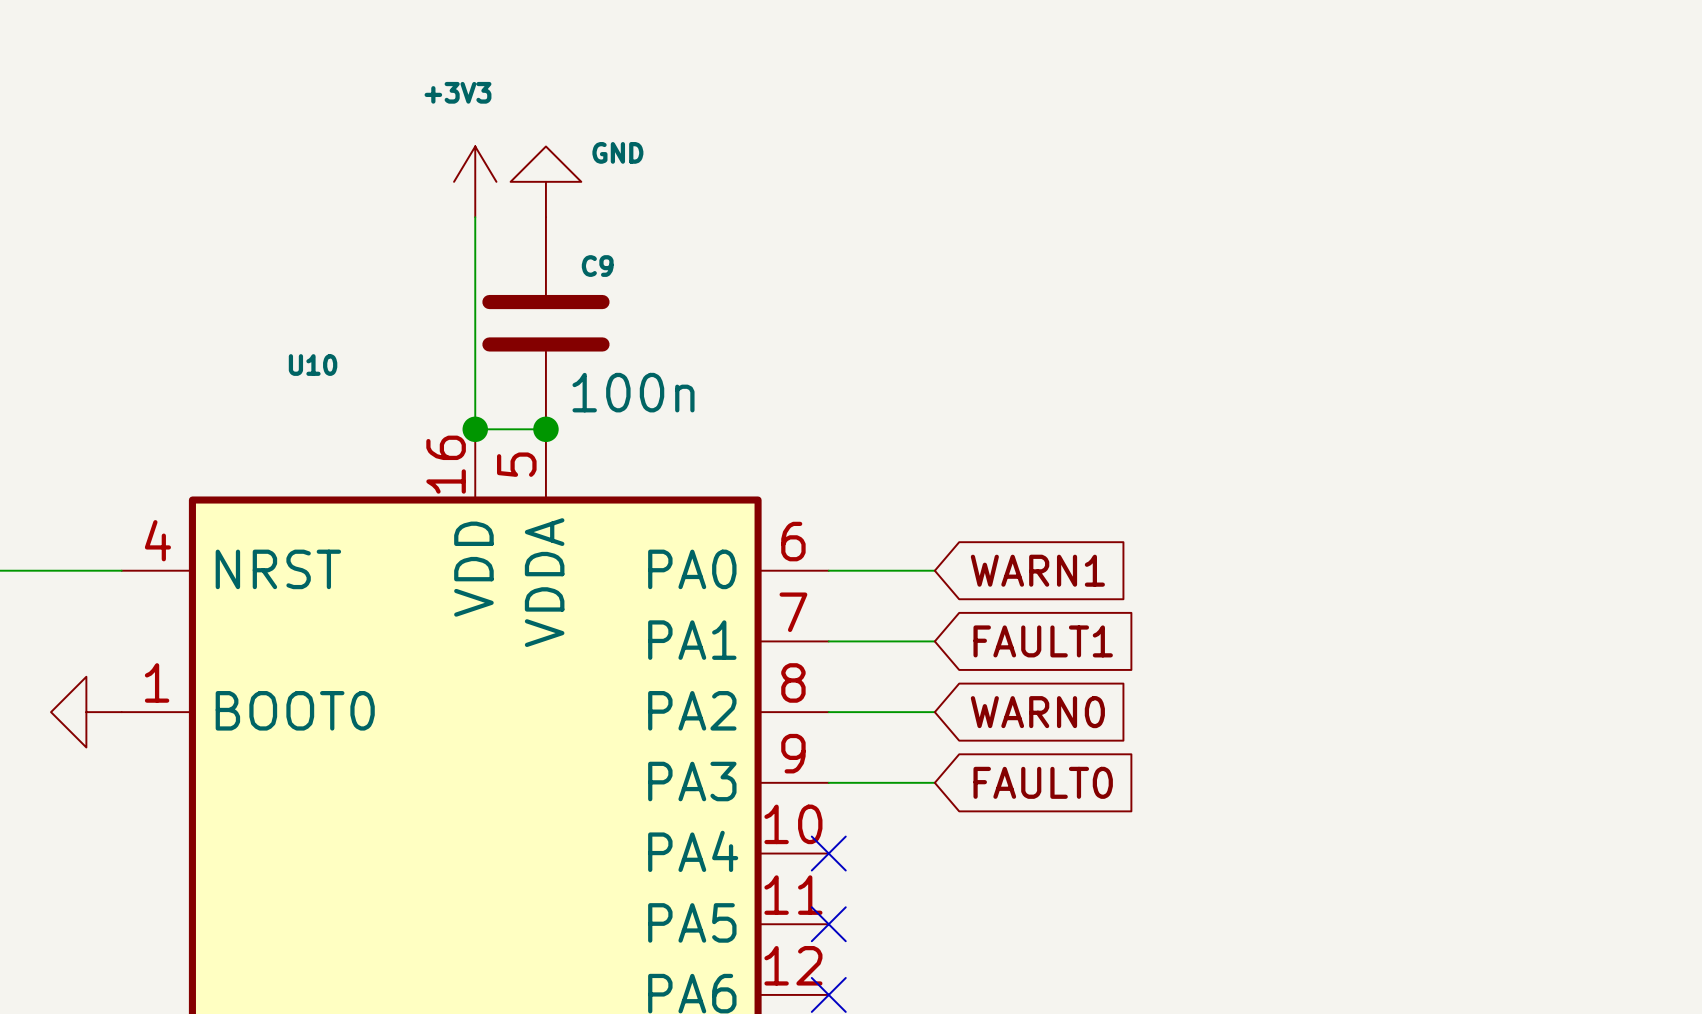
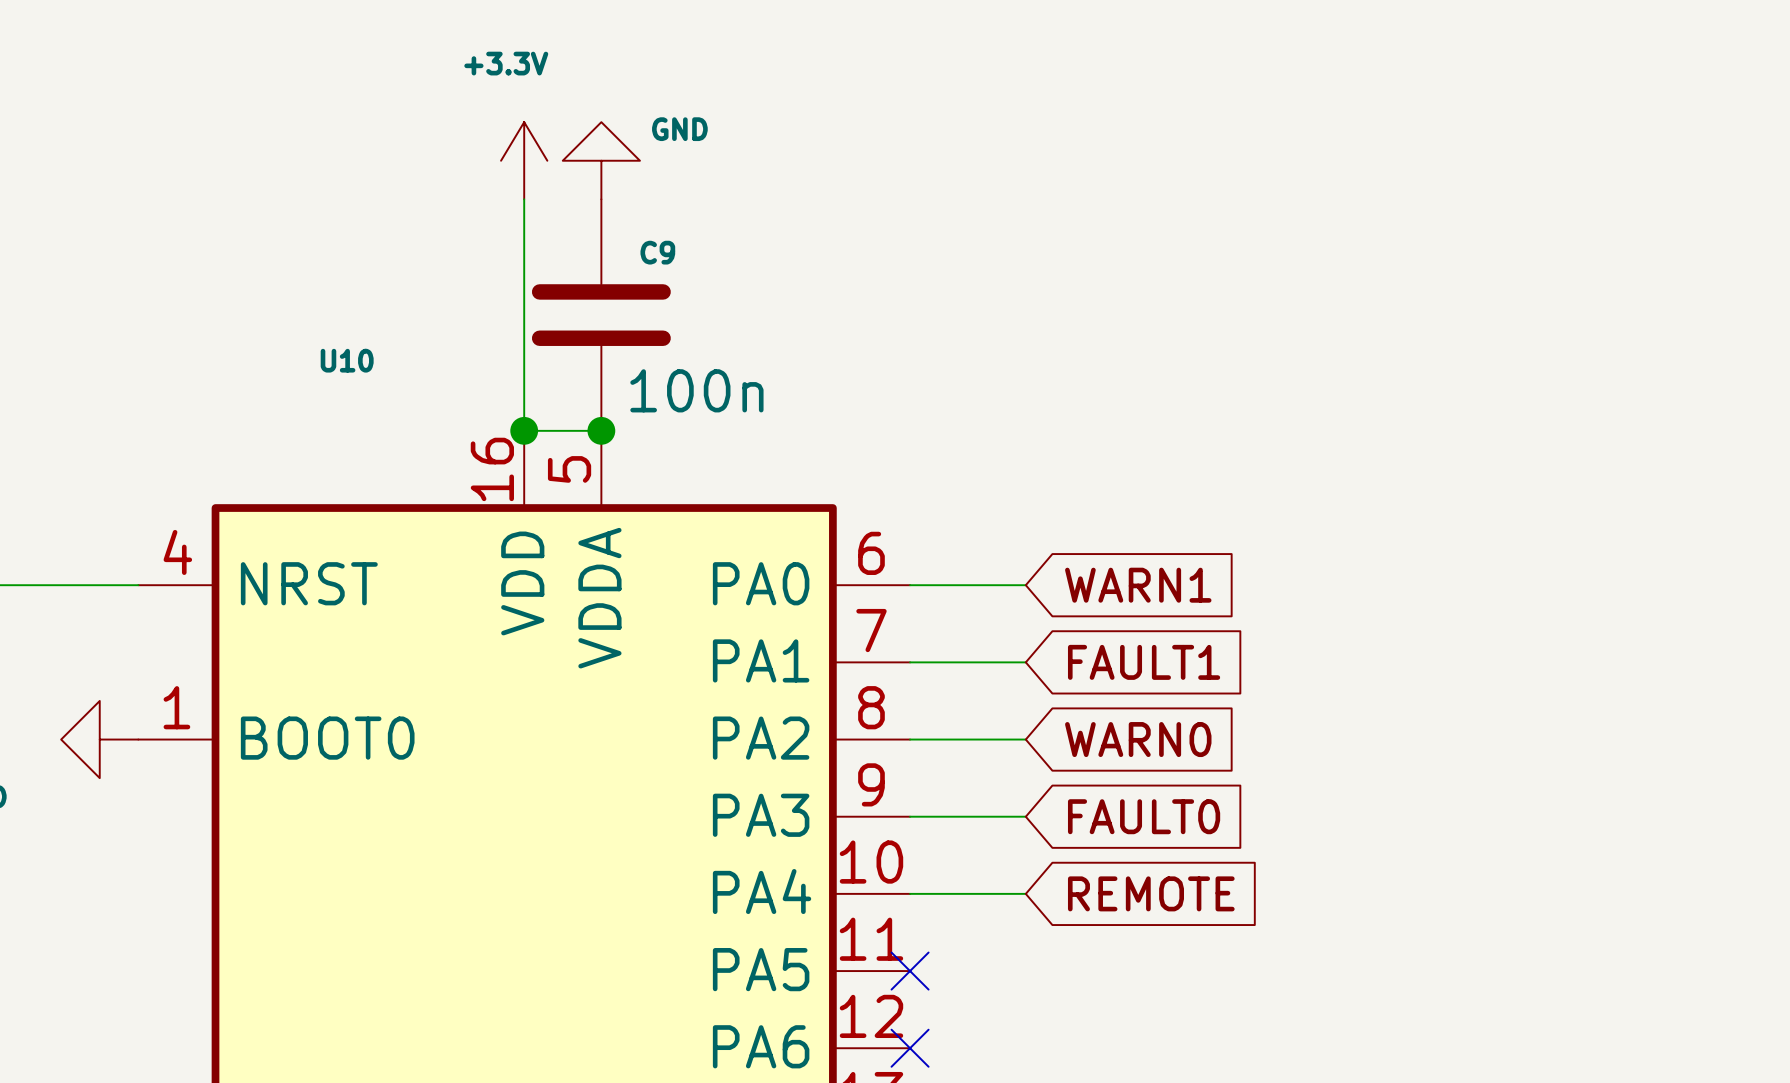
power symbol: +3V3 (475, 181) -> +3.3V (524, 160)
wire: none -> (910, 893) (1025, 893)
no-connect mark: (828, 853) -> none
global label: none -> REMOTE (1151, 893)

